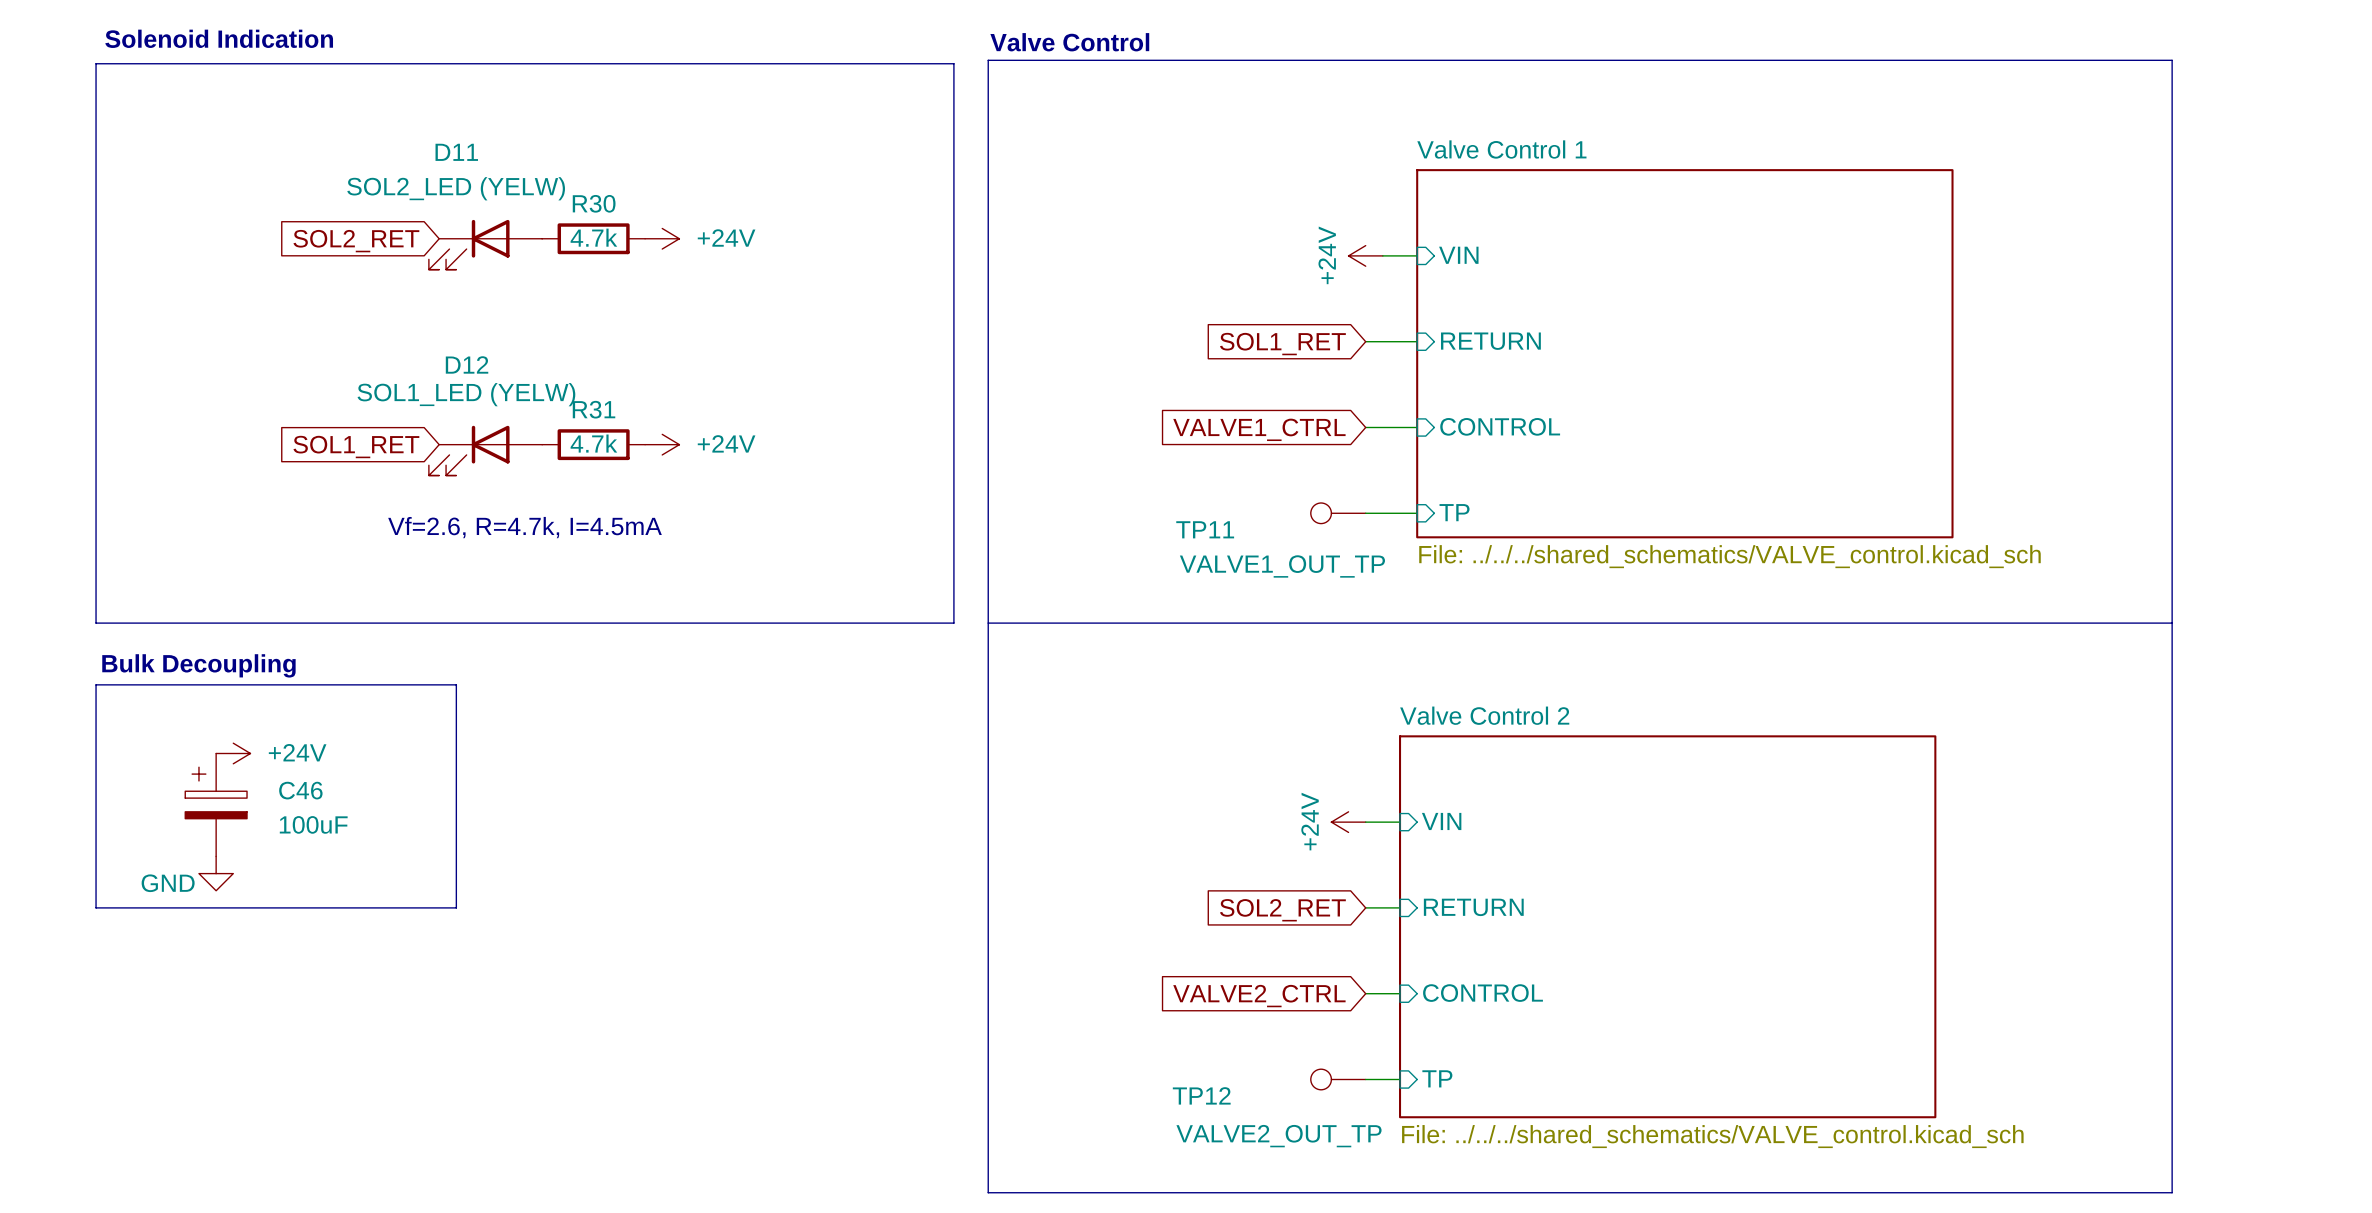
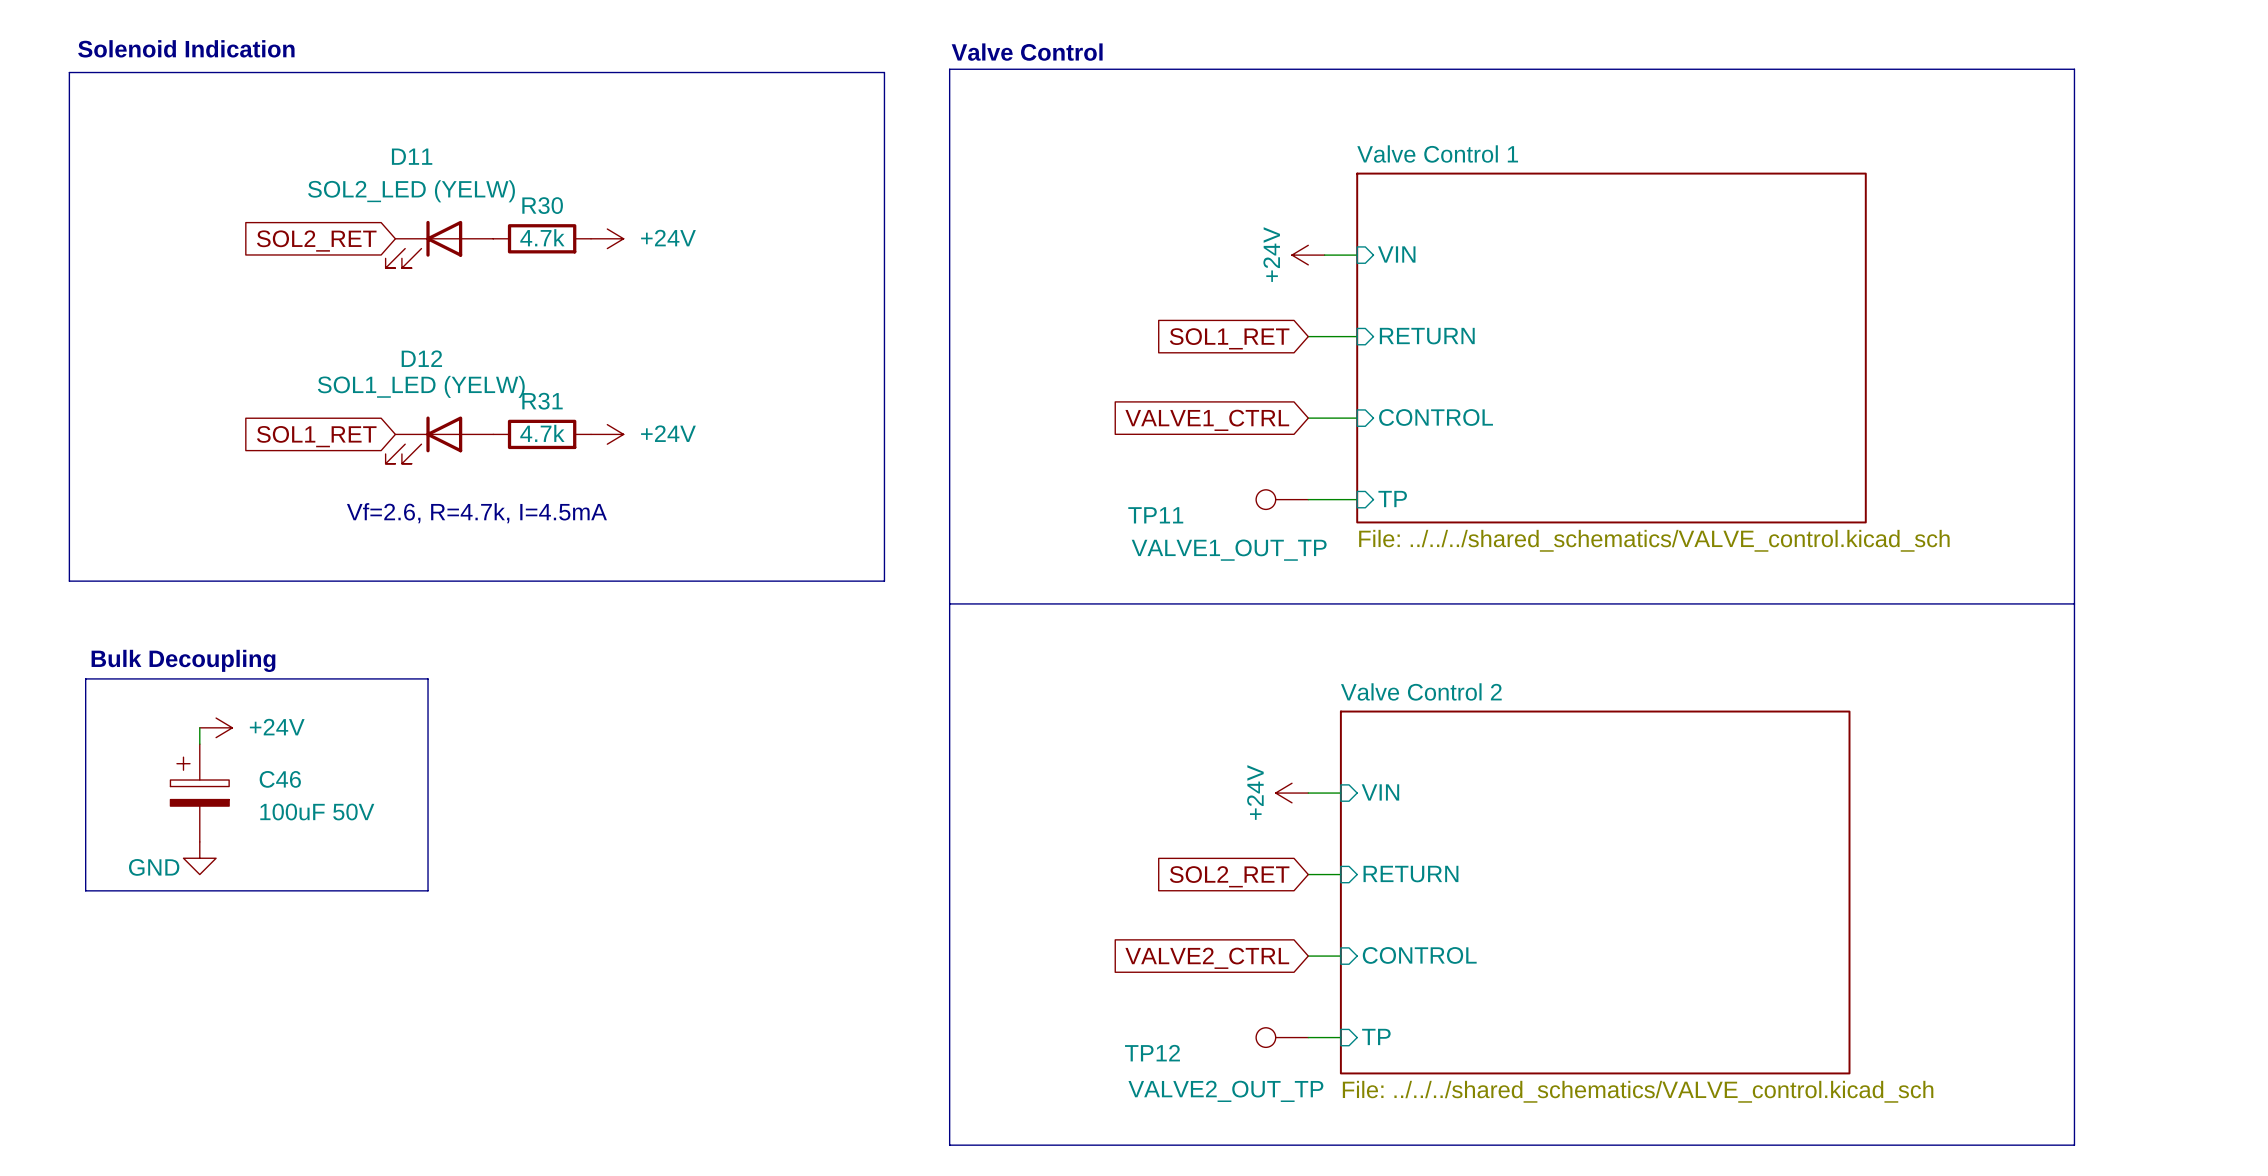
text position: Solenoid Indication (219, 38) -> Solenoid Indication (186, 48)
line: (96, 63) (96, 623) (953, 623) (953, 63) (919, 63) -> (101, 72) (69, 72) (69, 581) (884, 581) (884, 72)
R30 position: (593, 238) -> (542, 238)
power symbol position: +24V (662, 238) -> +24V (607, 238)
global label position: SOL2_RET (356, 241) -> SOL2_RET (316, 241)
D11 position: (485, 244) -> (439, 244)
R31 position: (593, 444) -> (542, 434)
power symbol position: +24V (662, 444) -> +24V (607, 434)
global label position: SOL1_RET (356, 447) -> SOL1_RET (316, 436)
D12 position: (485, 450) -> (439, 440)
text position: Vf=2.6, R=4.7k, I=4.5mA (525, 527) -> Vf=2.6, R=4.7k, I=4.5mA (476, 513)
text position: Bulk Decoupling (198, 665) -> Bulk Decoupling (183, 660)
line: (96, 684) (96, 907) (456, 907) (456, 684) (96, 684) -> (85, 678) (85, 890) (428, 890) (428, 678) (85, 678)
wire: none -> (199, 727) (199, 744)
power symbol position: +24V (233, 753) -> +24V (216, 727)
C46 position: (216, 804) -> (199, 793)
C46 value: 100uF (313, 824) -> 100uF 50V (317, 811)
power symbol position: GND (216, 873) -> GND (199, 858)

